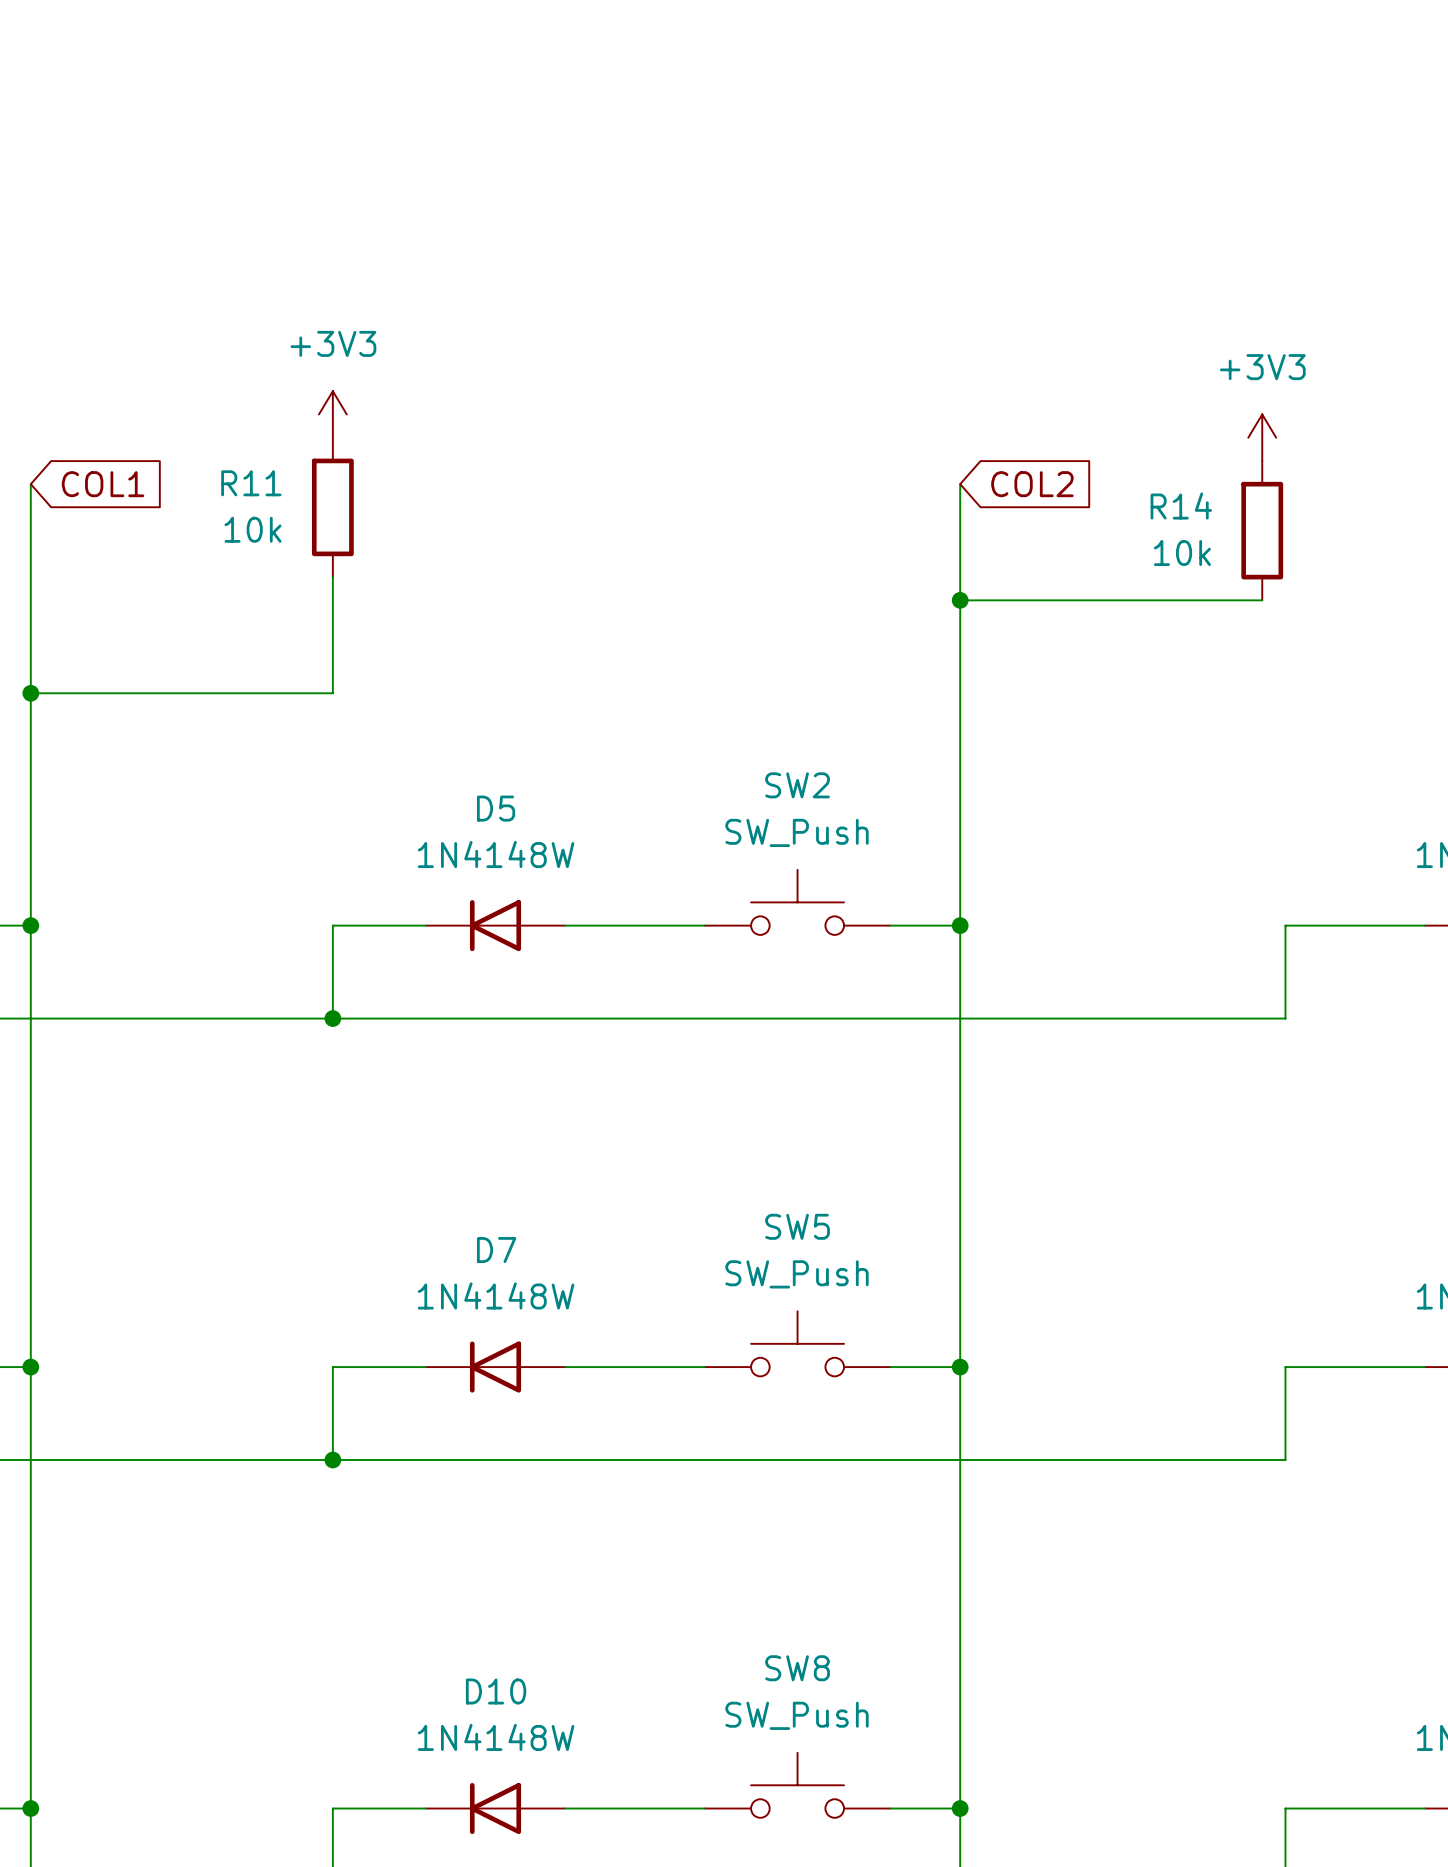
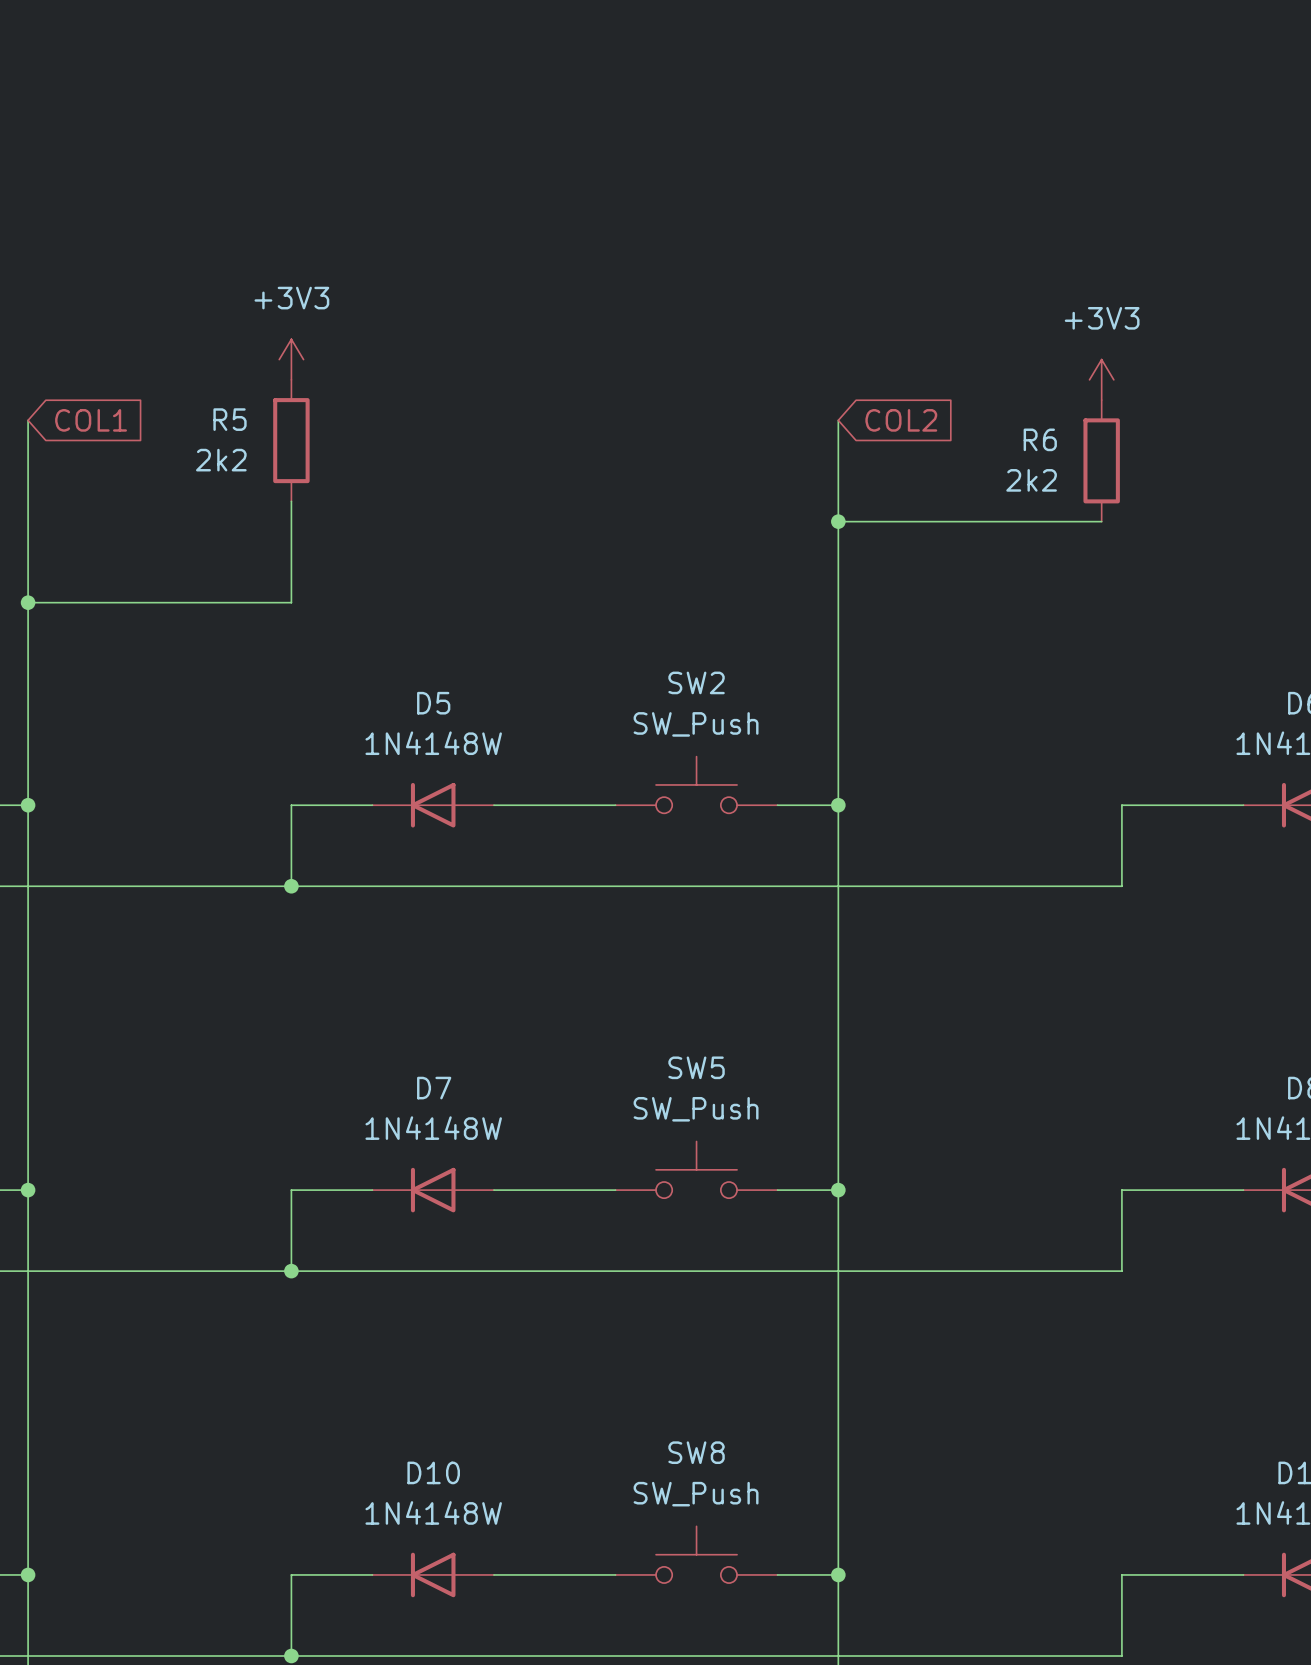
R11 name: R11 (251, 483) -> R5 (230, 419)
R14 name: R14 (1181, 505) -> R6 (1040, 439)
R11 value: 10k (253, 529) -> 2k2 (221, 460)
R14 value: 10k (1182, 553) -> 2k2 (1031, 480)

